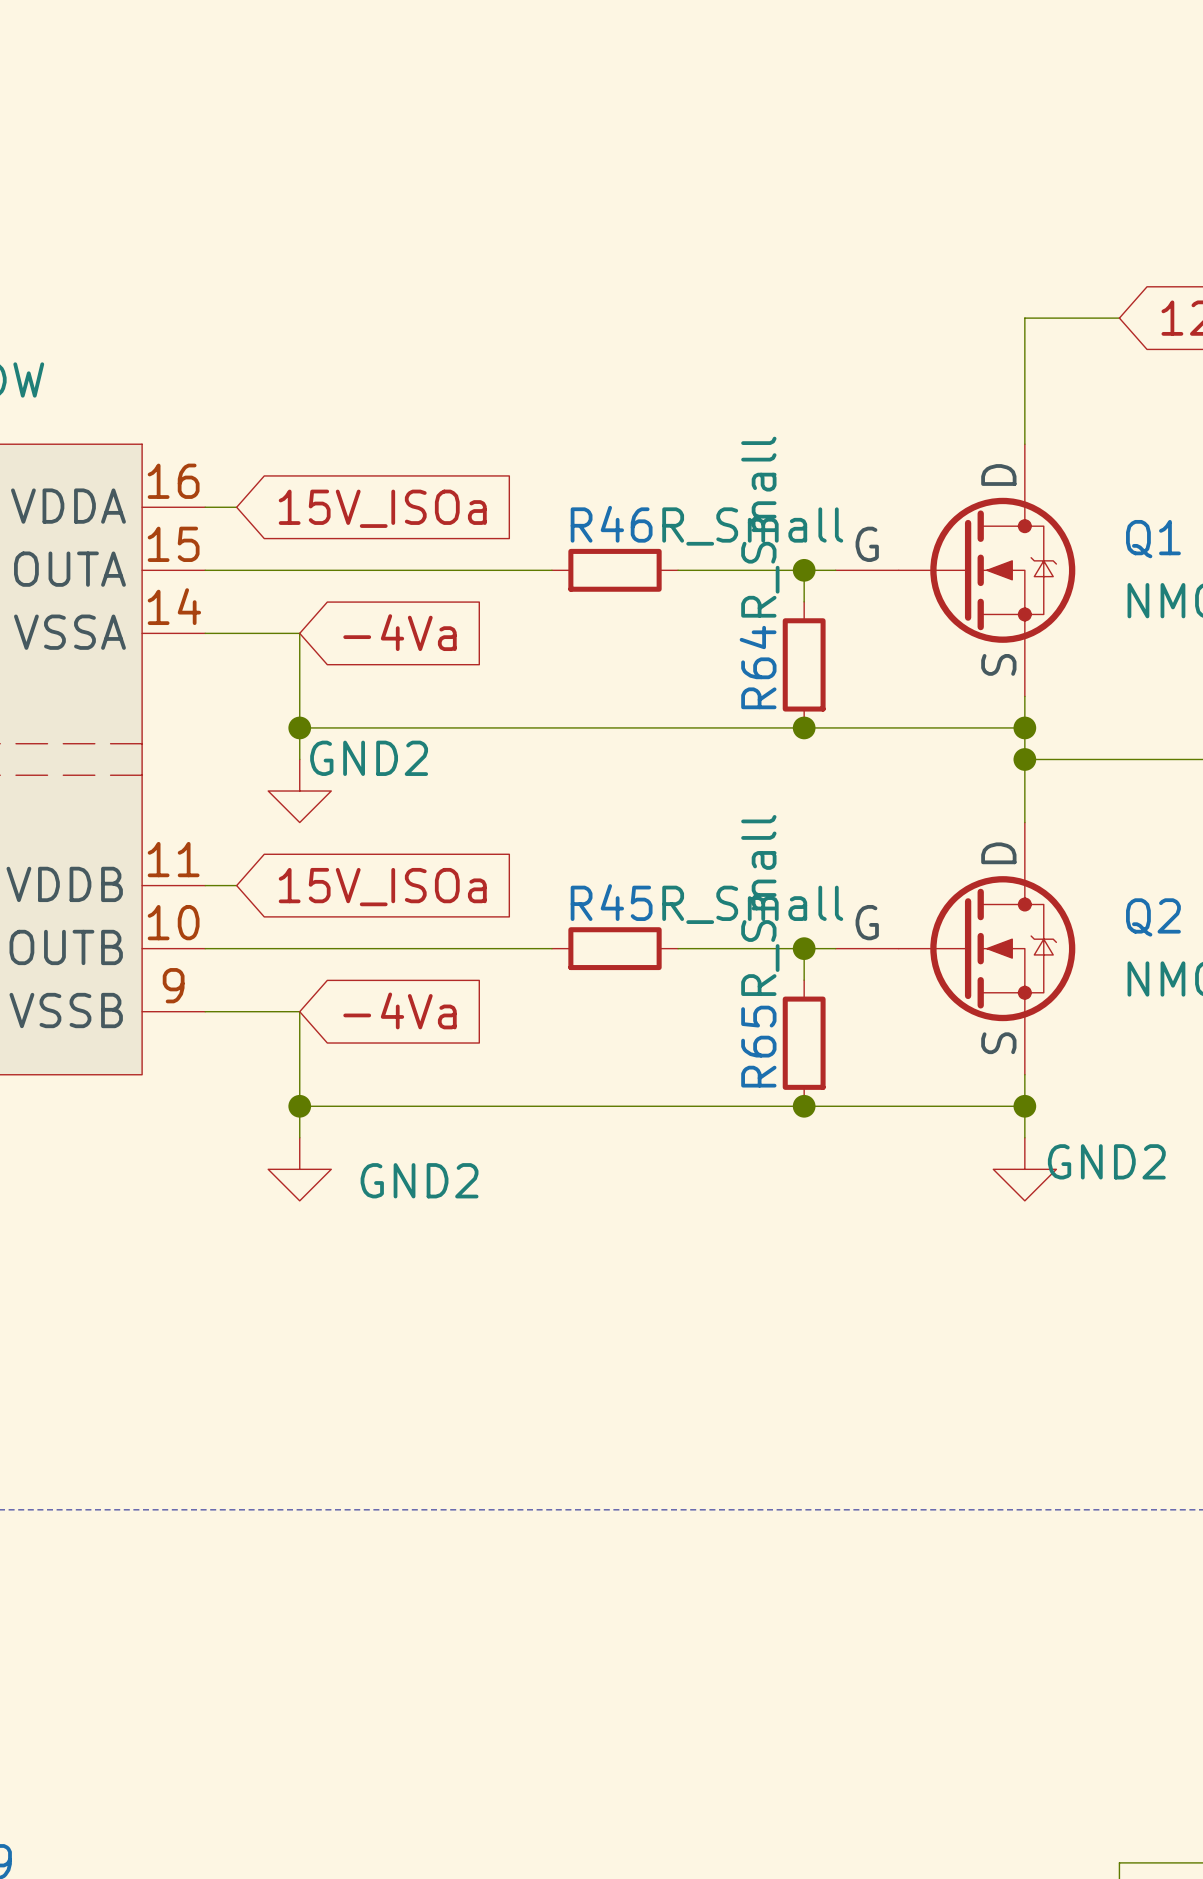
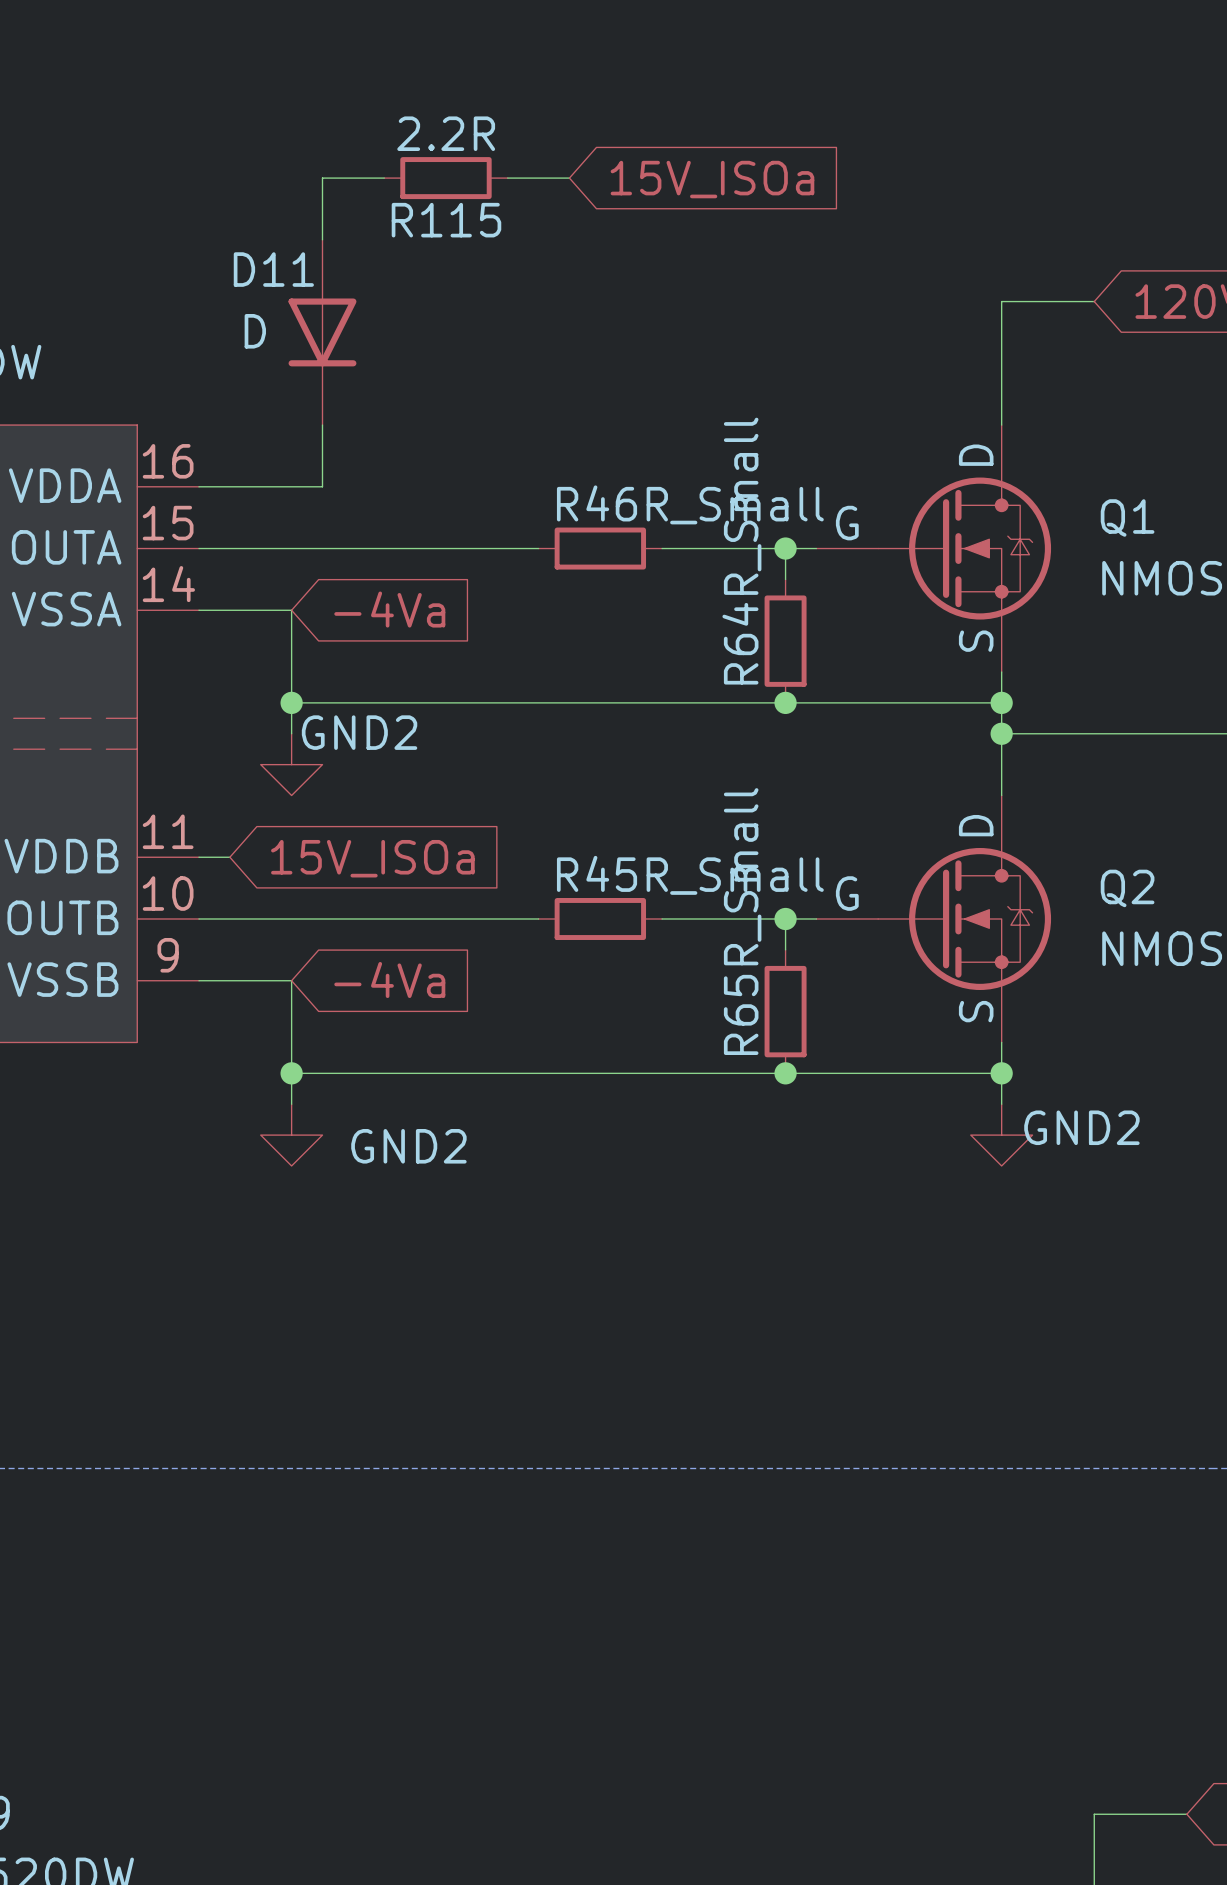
wire: none -> (384, 178) (322, 178) (322, 239)
R115: none -> 2.2R (445, 178)
wire: none -> (507, 178) (569, 178)
D11: none -> D (322, 332)
wire: none -> (322, 425) (322, 486) (229, 486)
global label position: 15V_ISOa (382, 508) -> 15V_ISOa (712, 179)

